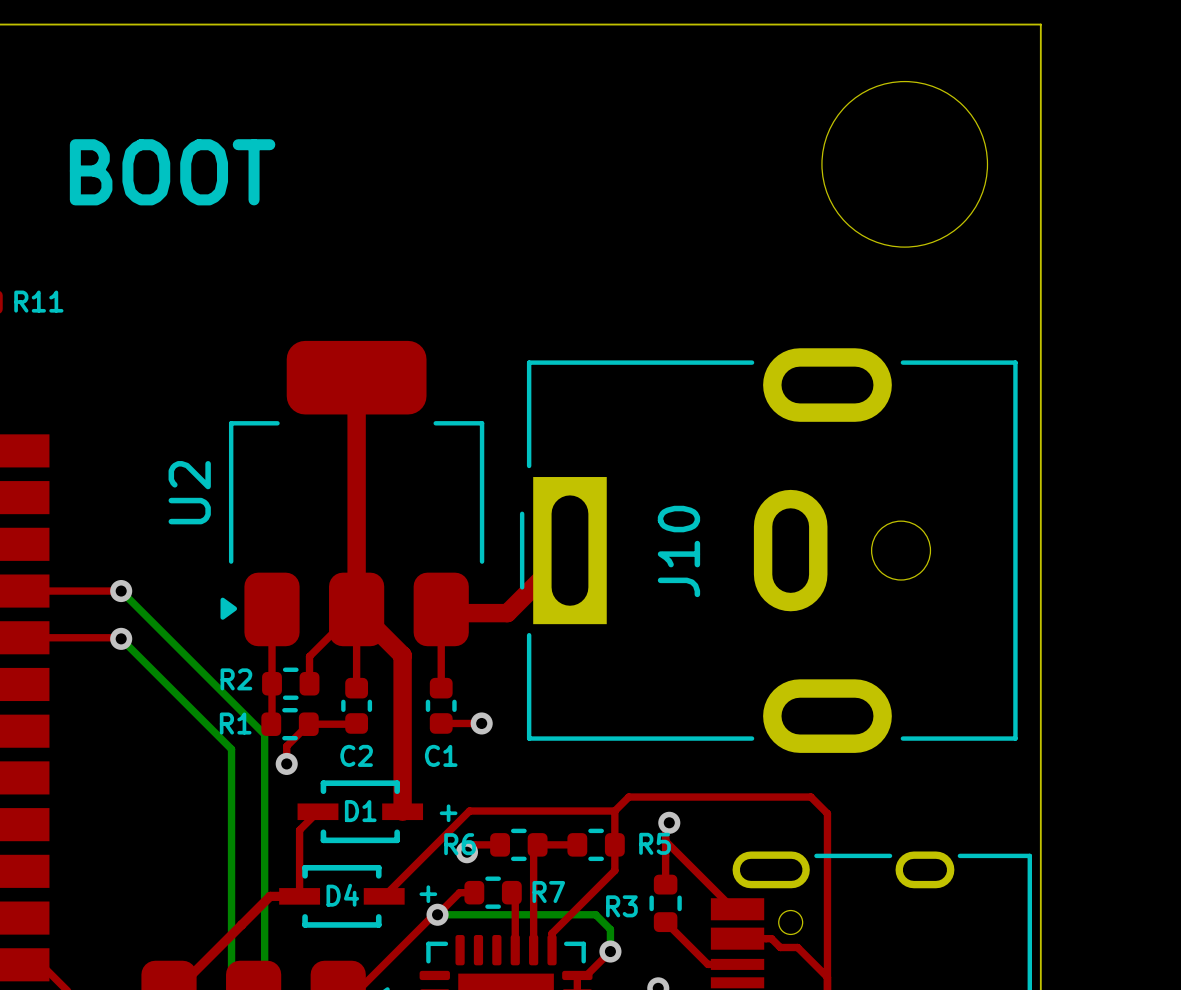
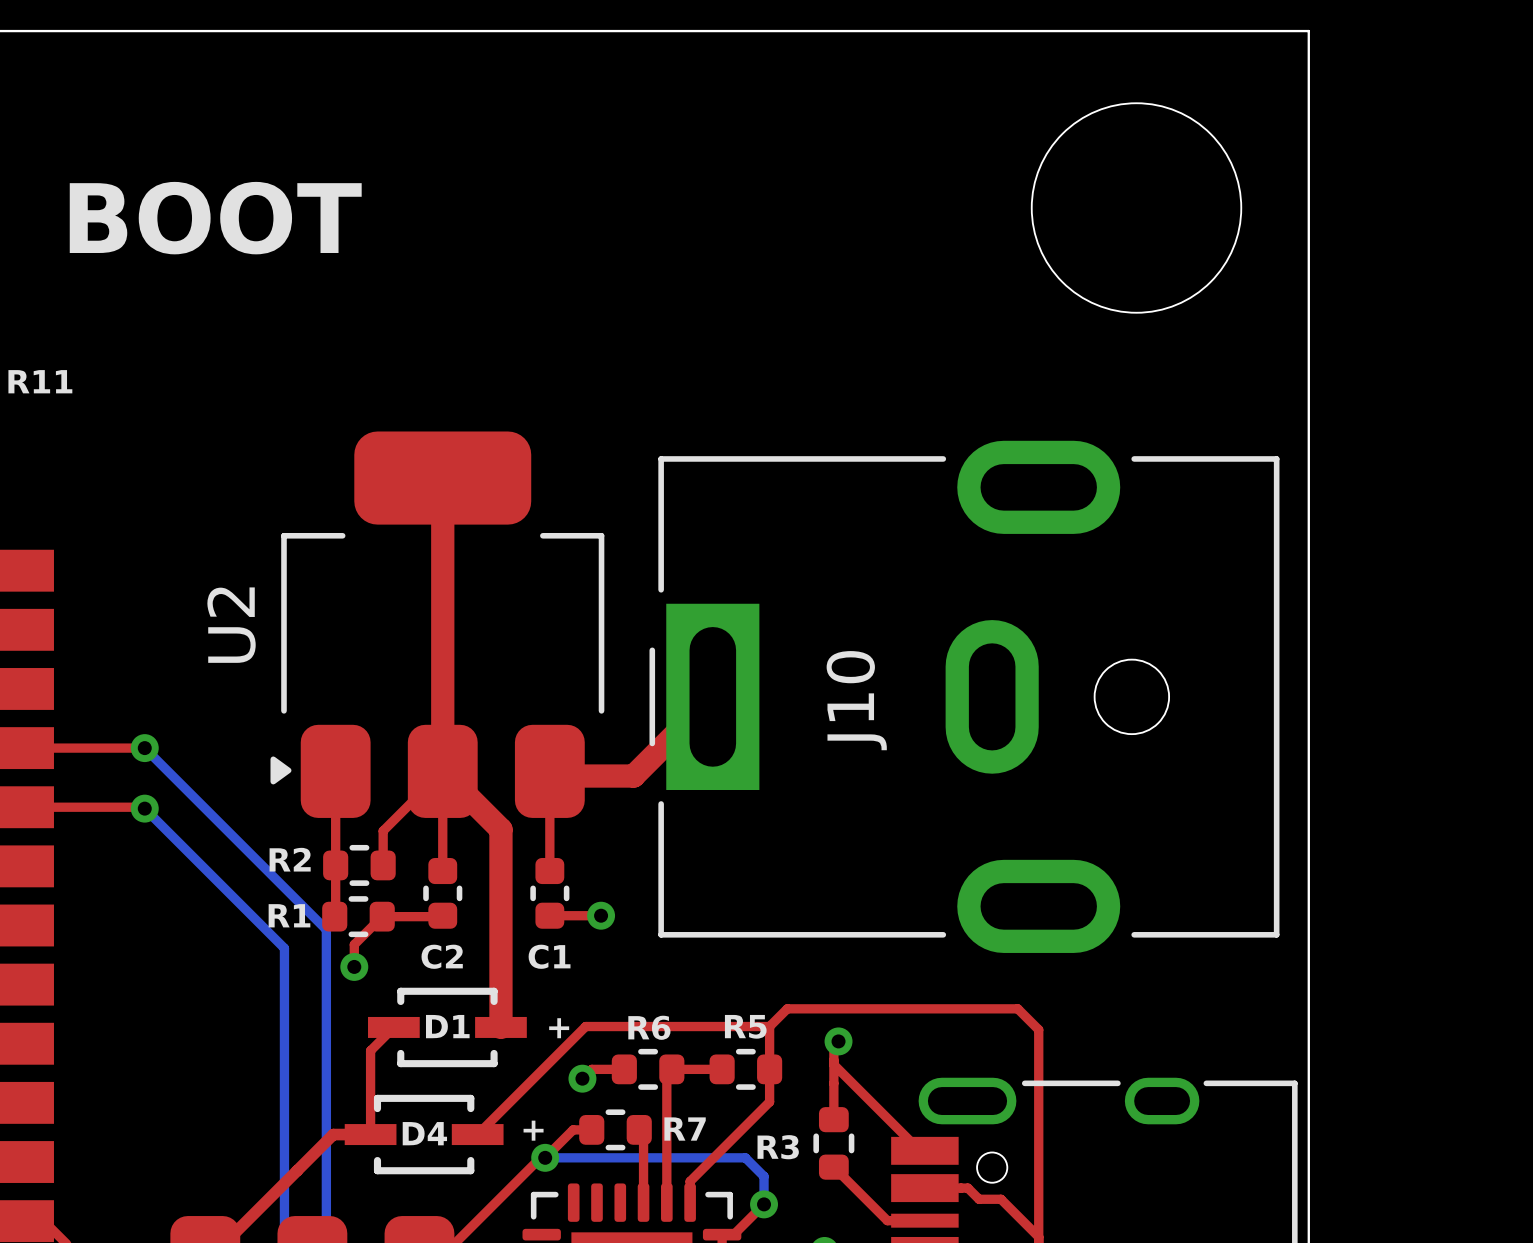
R5 name position: R5 (655, 843) -> R5 (745, 1026)
R6 name position: R6 (460, 844) -> R6 (649, 1027)

